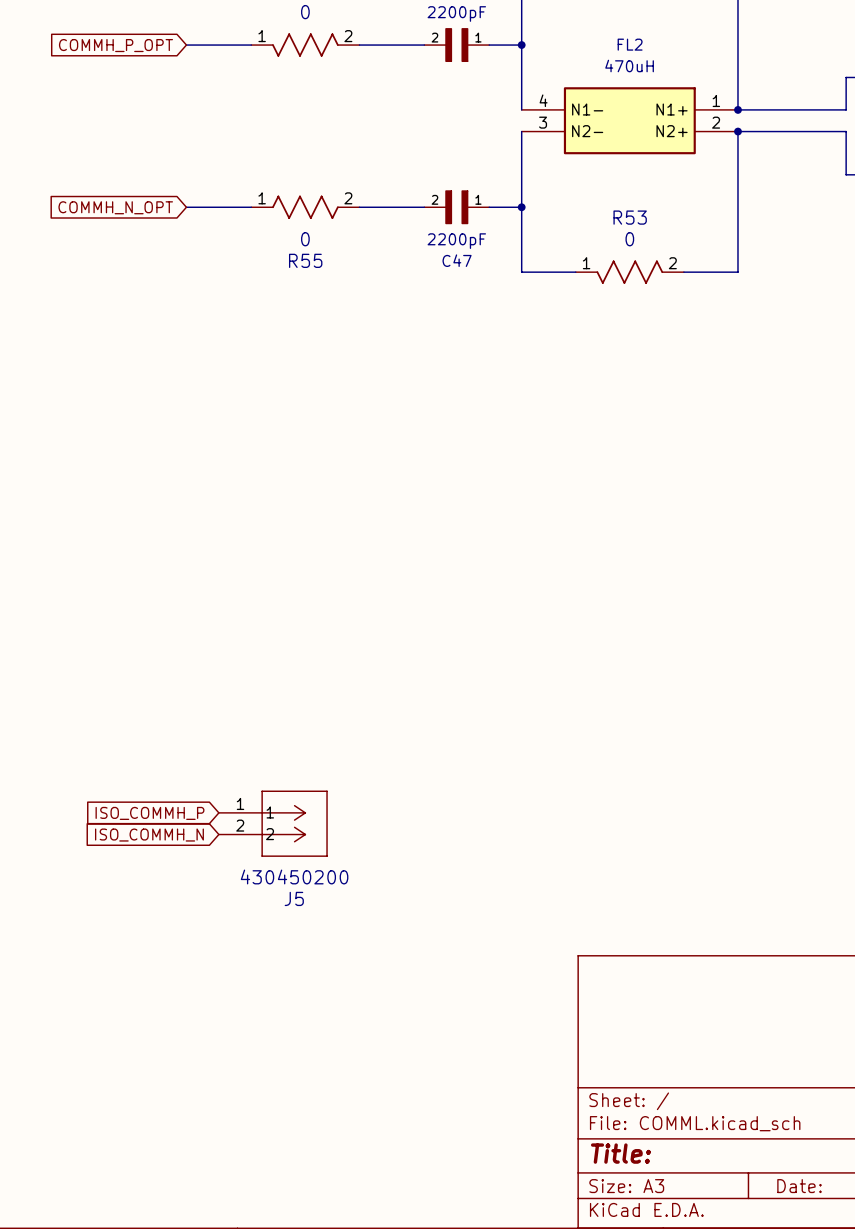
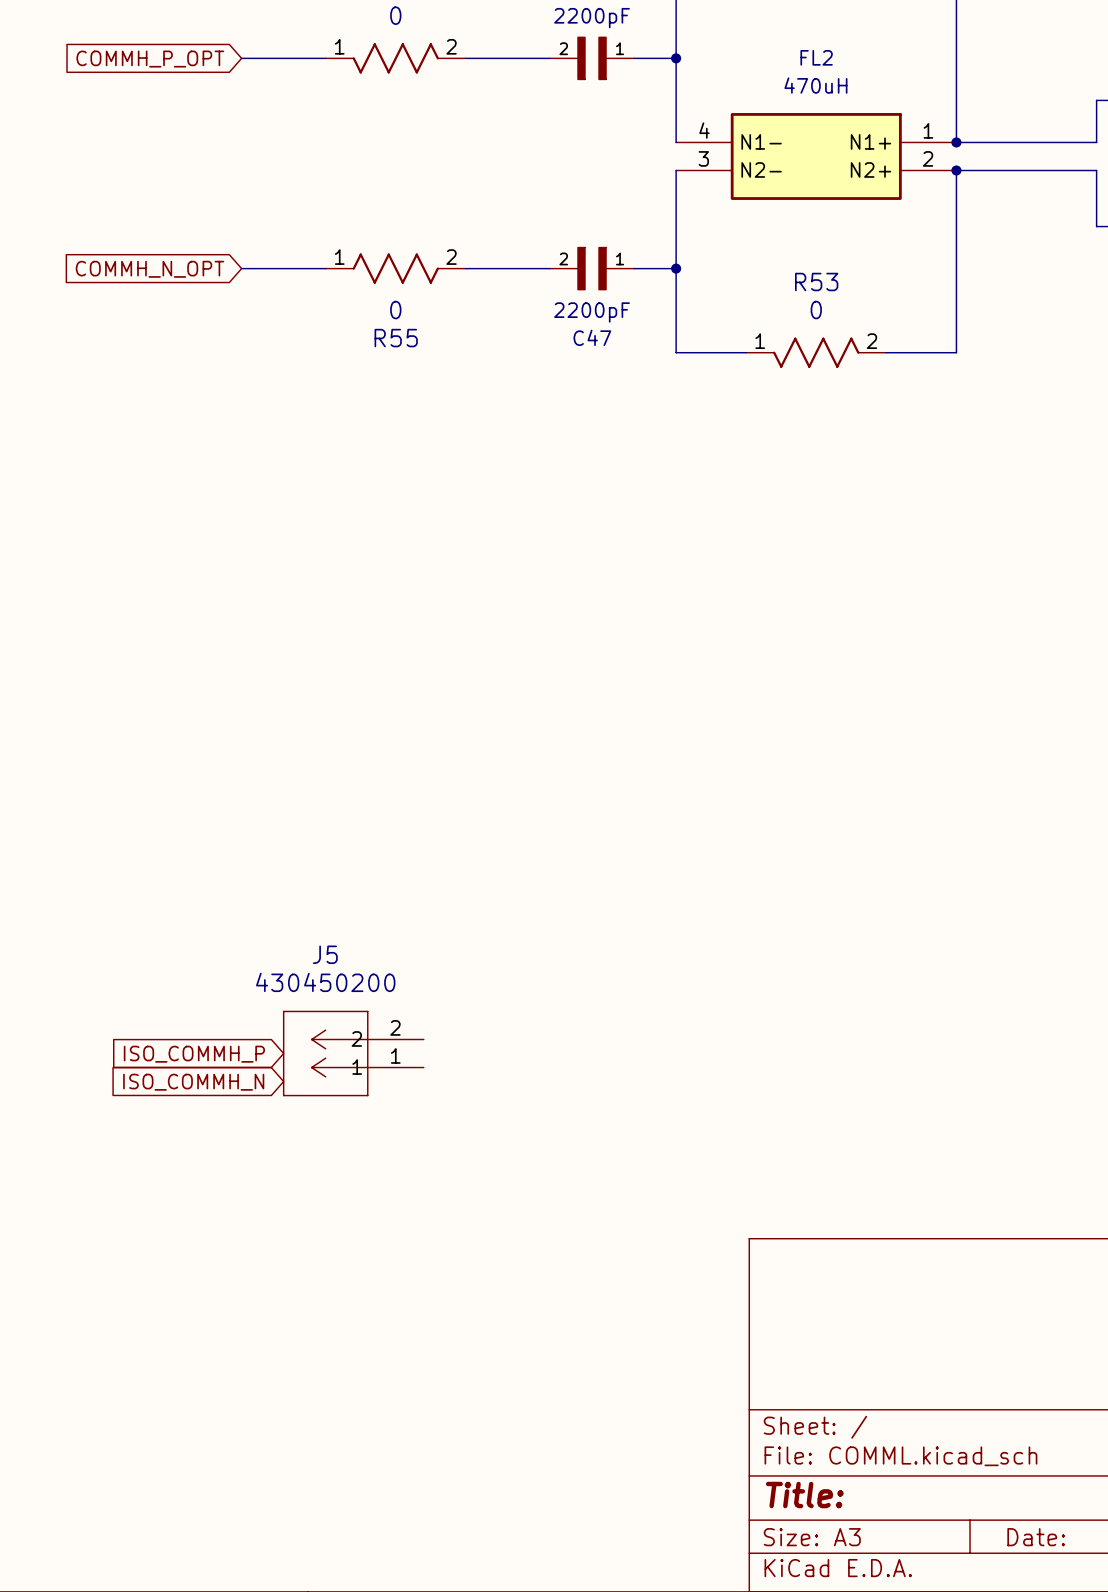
J5 rotation: 0° (294, 823) -> 180° (325, 1053)

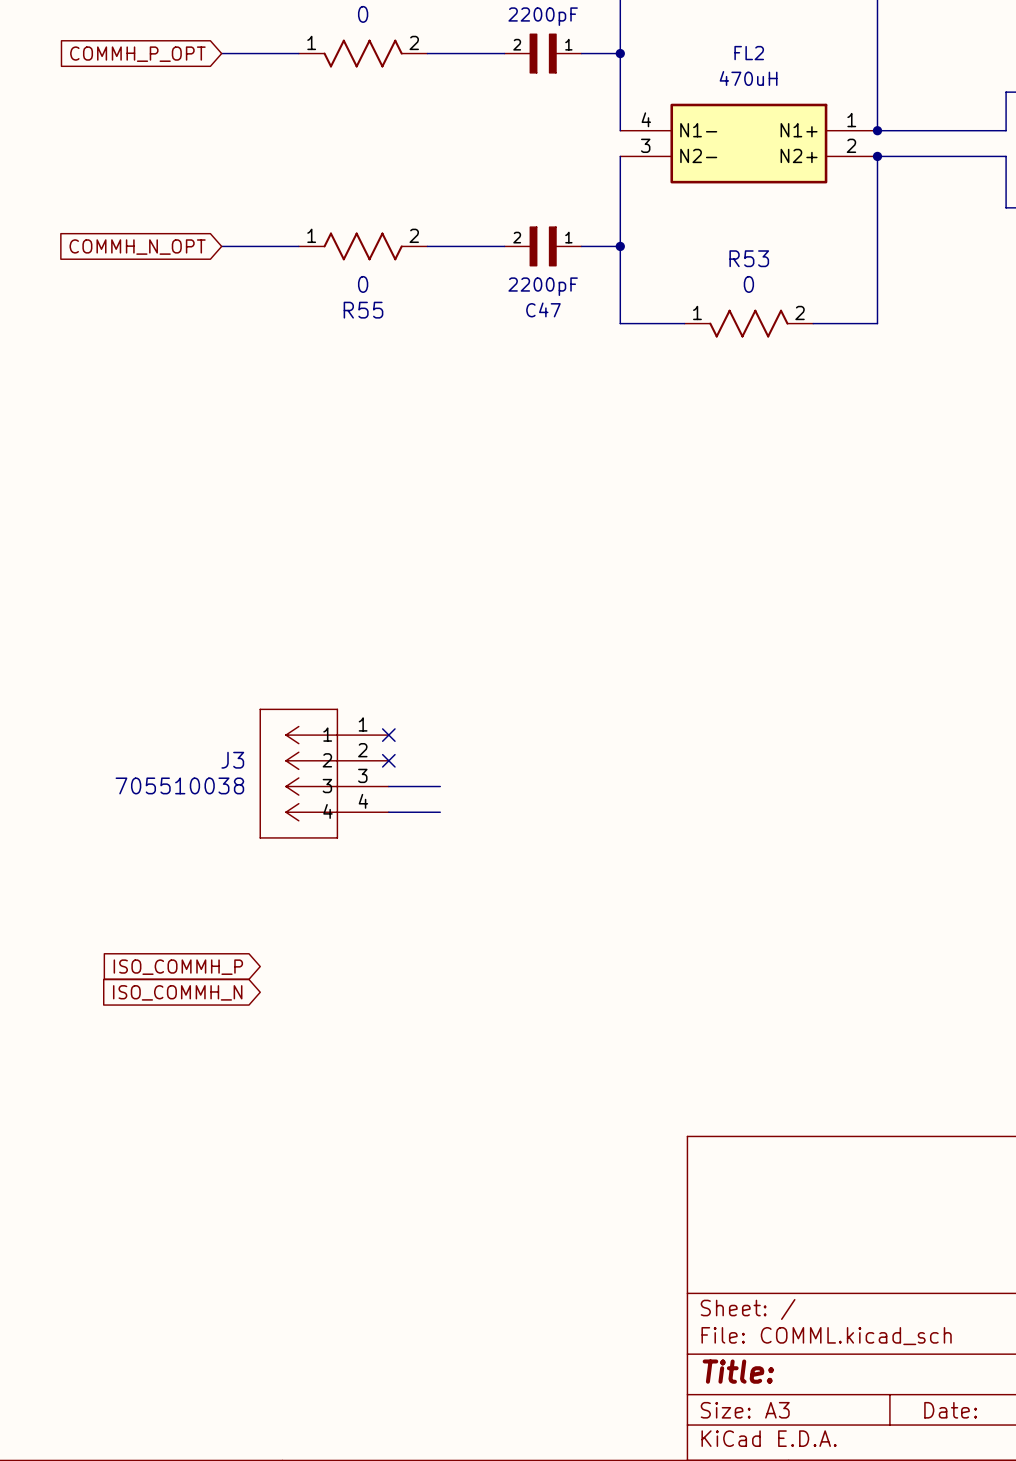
no-connect mark: none -> (388, 735)
no-connect mark: none -> (388, 760)
J3: none -> 705510038 (324, 773)
wire: none -> (388, 786) (440, 786)
wire: none -> (388, 812) (440, 812)
J5: 430450200 (353, 1053) -> none

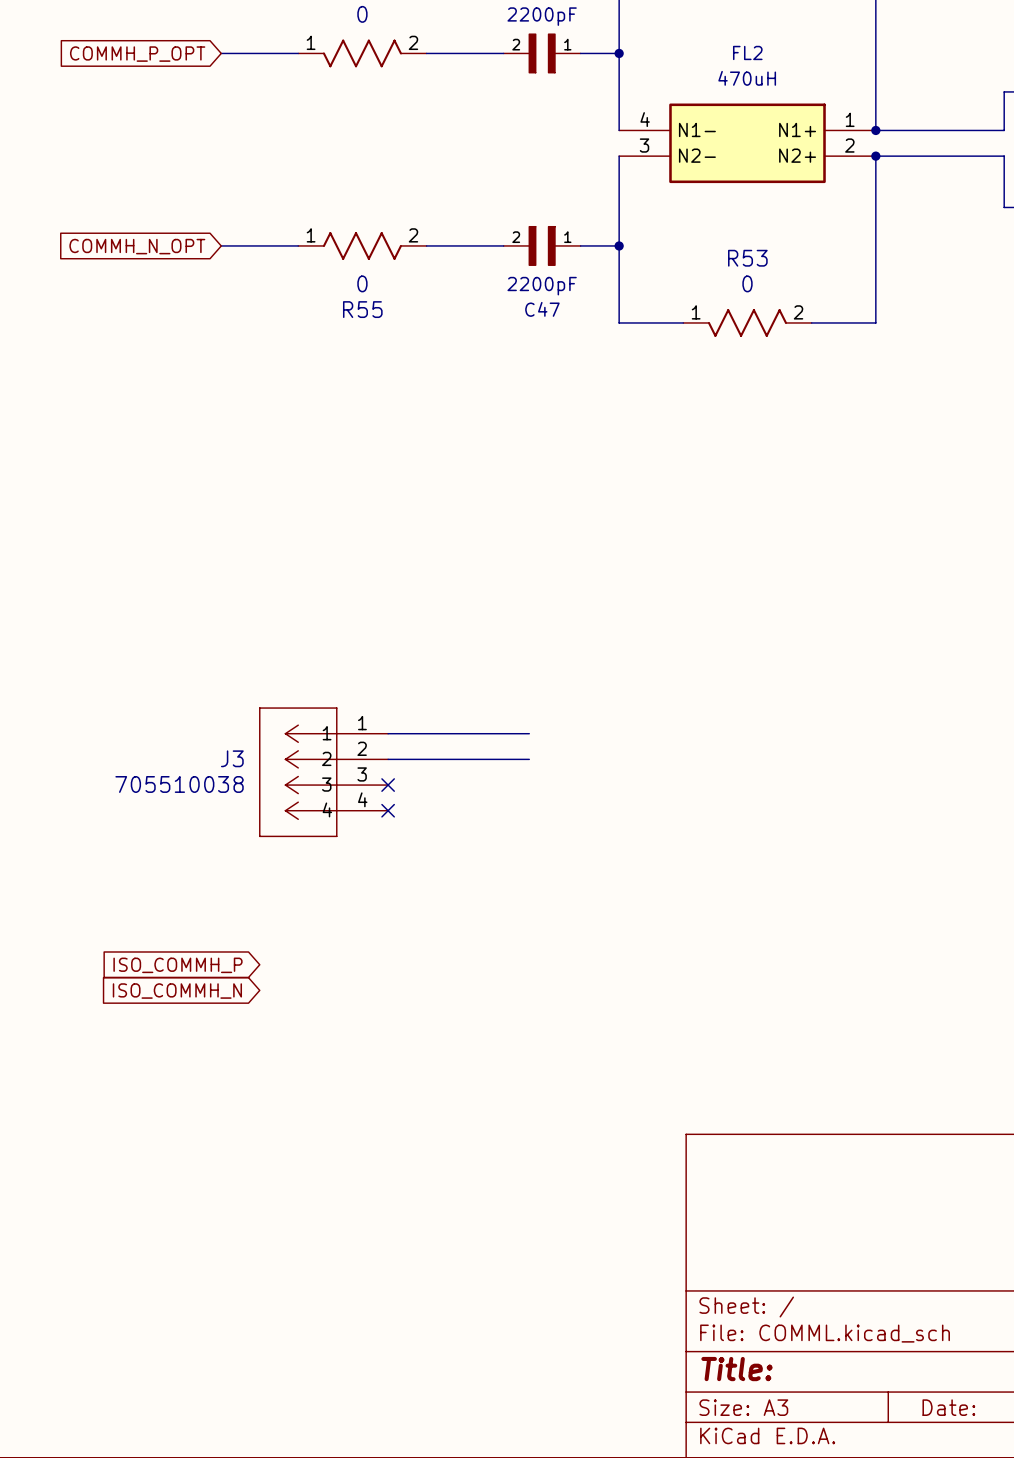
wire: none -> (388, 733) (529, 733)
no-connect mark: (388, 735) -> none
wire: none -> (388, 759) (529, 759)
no-connect mark: (388, 760) -> none
wire: (388, 786) (440, 786) -> none
no-connect mark: none -> (388, 785)
wire: (388, 812) (440, 812) -> none
no-connect mark: none -> (388, 810)

